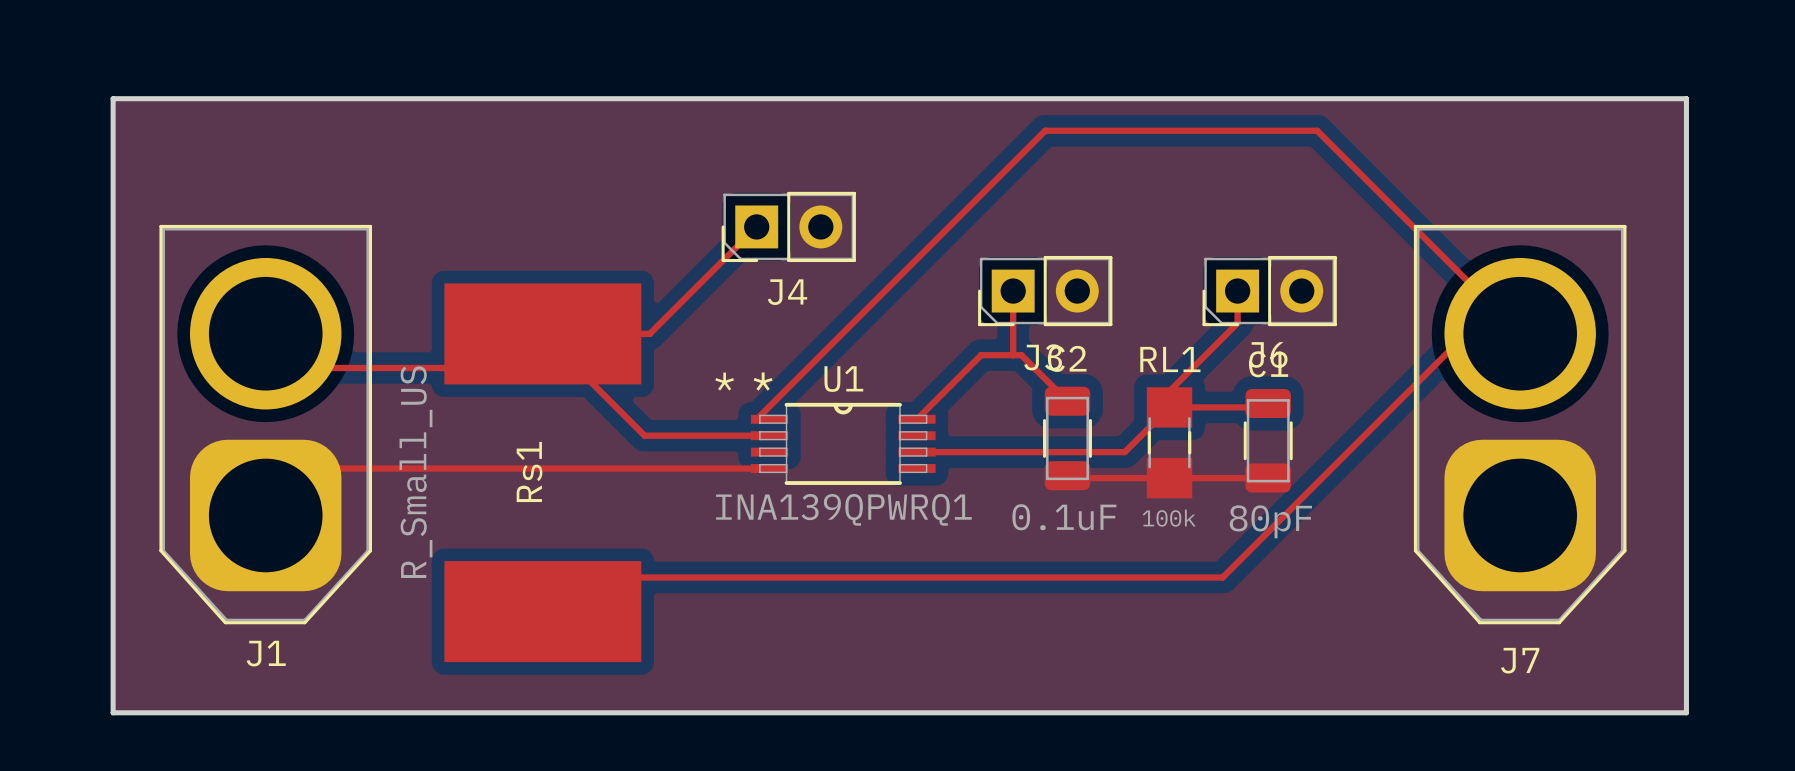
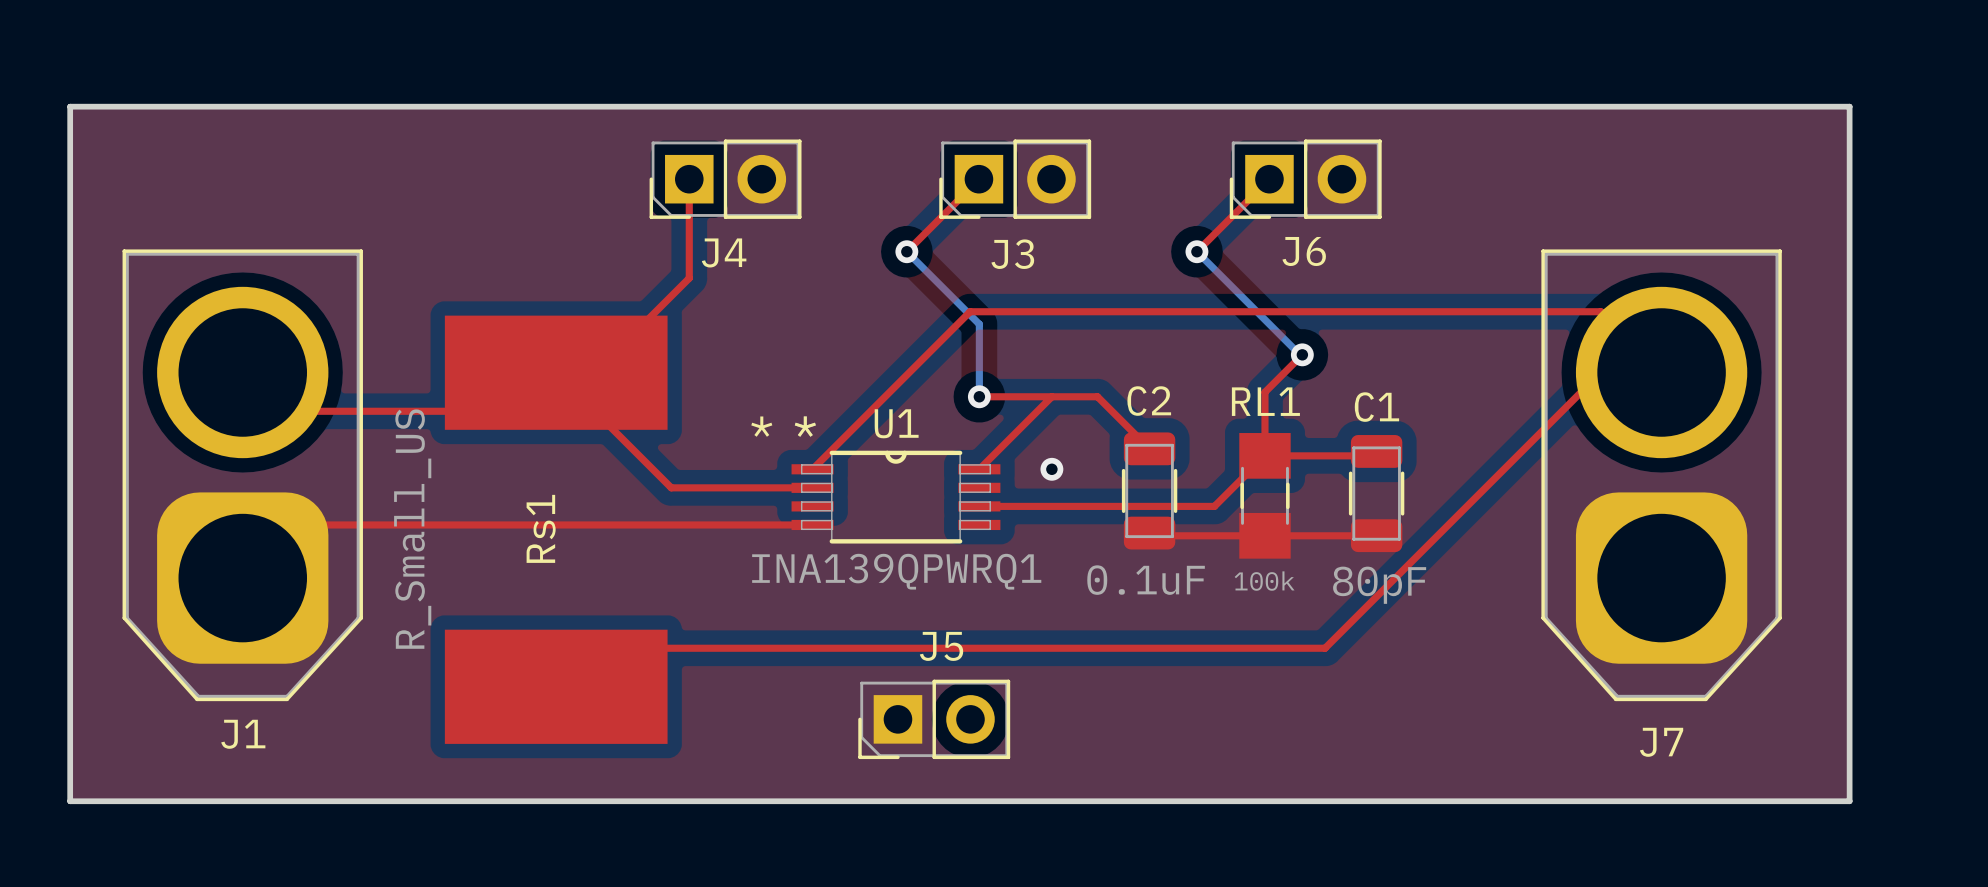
top track: none -> (1269, 179) (1196, 251)
top track: none -> (978, 179) (906, 251)
top track: (756, 226) (649, 333) (576, 333) -> (689, 179) (689, 278) (594, 372)
J4 position: (788, 226) -> (725, 179)
bottom track: none -> (906, 251) (979, 324) (979, 396)
via: none -> (906, 251)
bottom track: none -> (1196, 251) (1300, 354) (1302, 354)
via: none -> (1196, 251)
top track: (1466, 279) (1317, 130) (1045, 130) (756, 419) -> (1600, 311) (970, 311) (812, 469)
top track: (1013, 291) (1013, 355) -> none
J3 position: (1045, 291) -> (1015, 179)
top track: (1237, 291) (1237, 323) (1169, 391) -> (1302, 354) (1264, 392) (1264, 437)
J6 position: (1269, 291) -> (1305, 179)
via: none -> (1302, 354)
top track: none -> (979, 396) (1051, 396)
via: none -> (979, 396)
via: none -> (1051, 469)
J5: none -> (934, 719)

